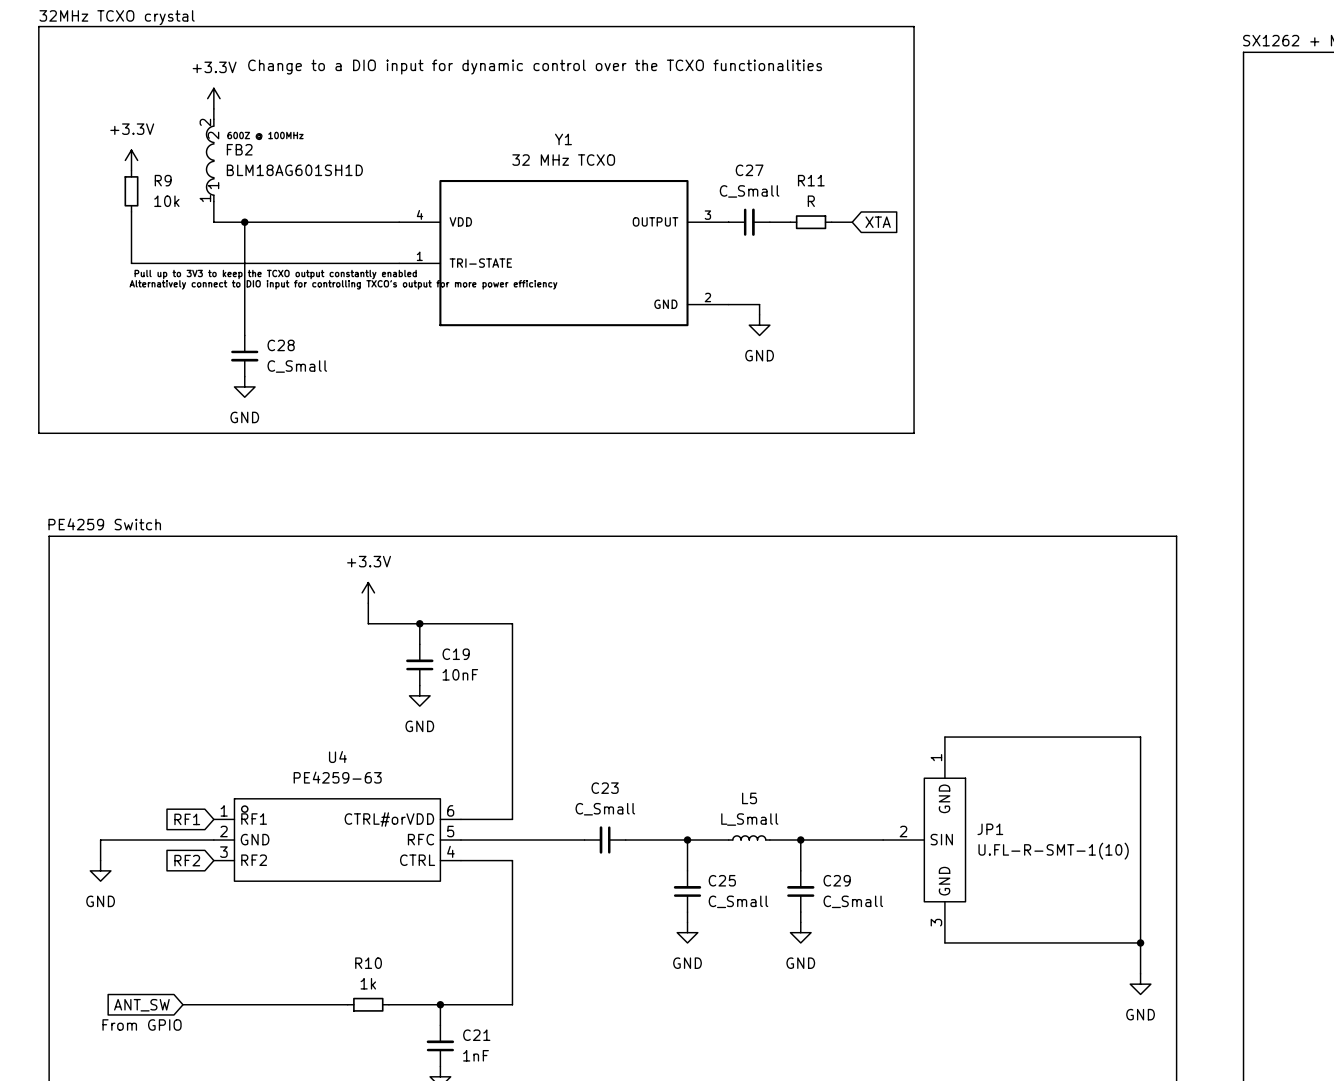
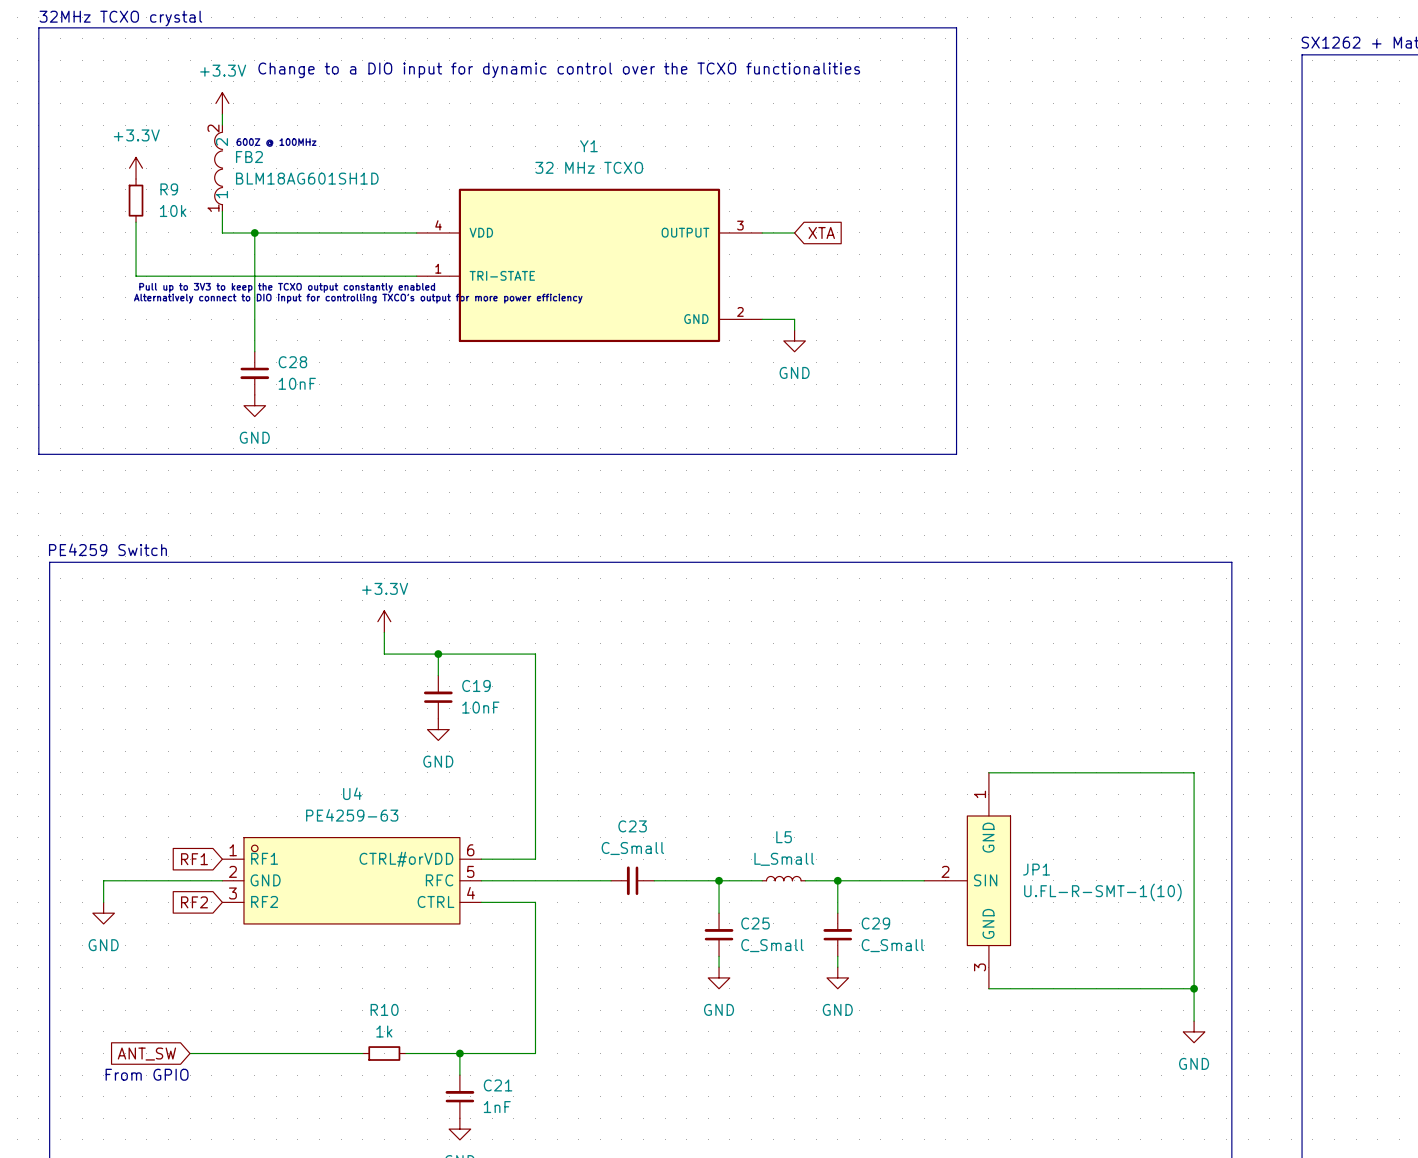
C27: C_Small (749, 222) -> none
wire: (769, 222) (790, 222) -> none
R11: R (811, 222) -> none
wire: (831, 222) (852, 222) -> none
global label position: XTA (878, 222) -> XTA (821, 232)
C28 value: C_Small (297, 366) -> 10nF (297, 383)

